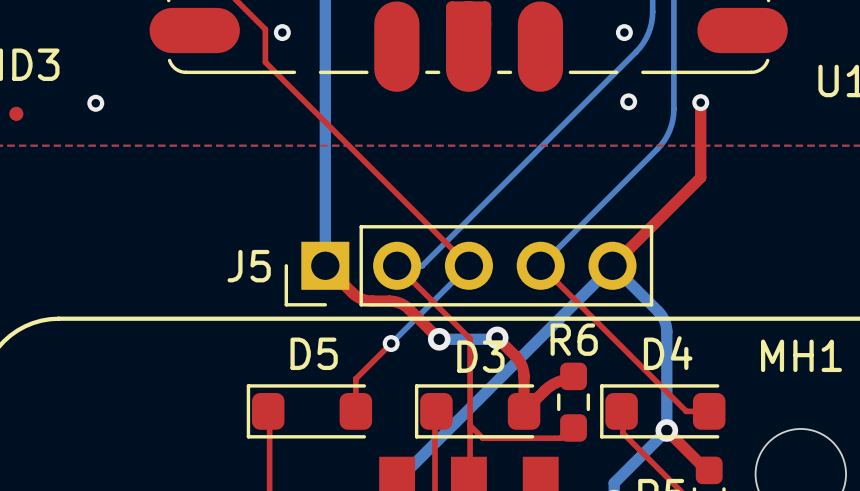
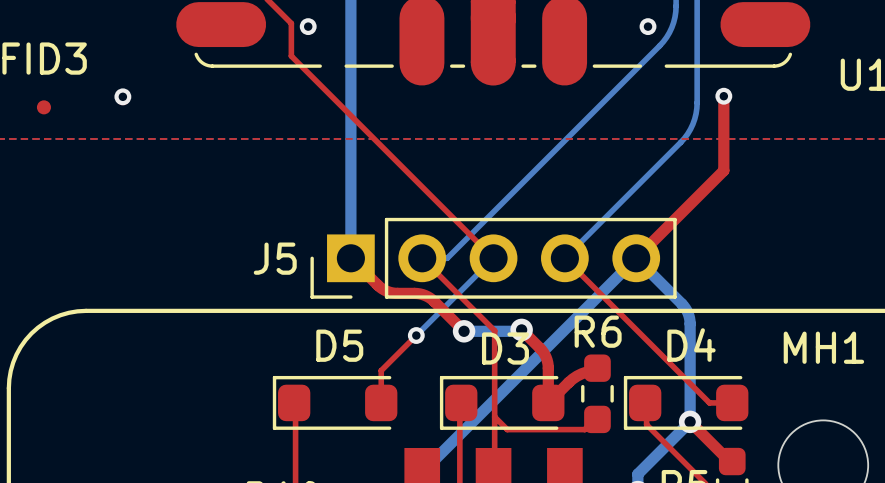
via: (628, 101) -> none

